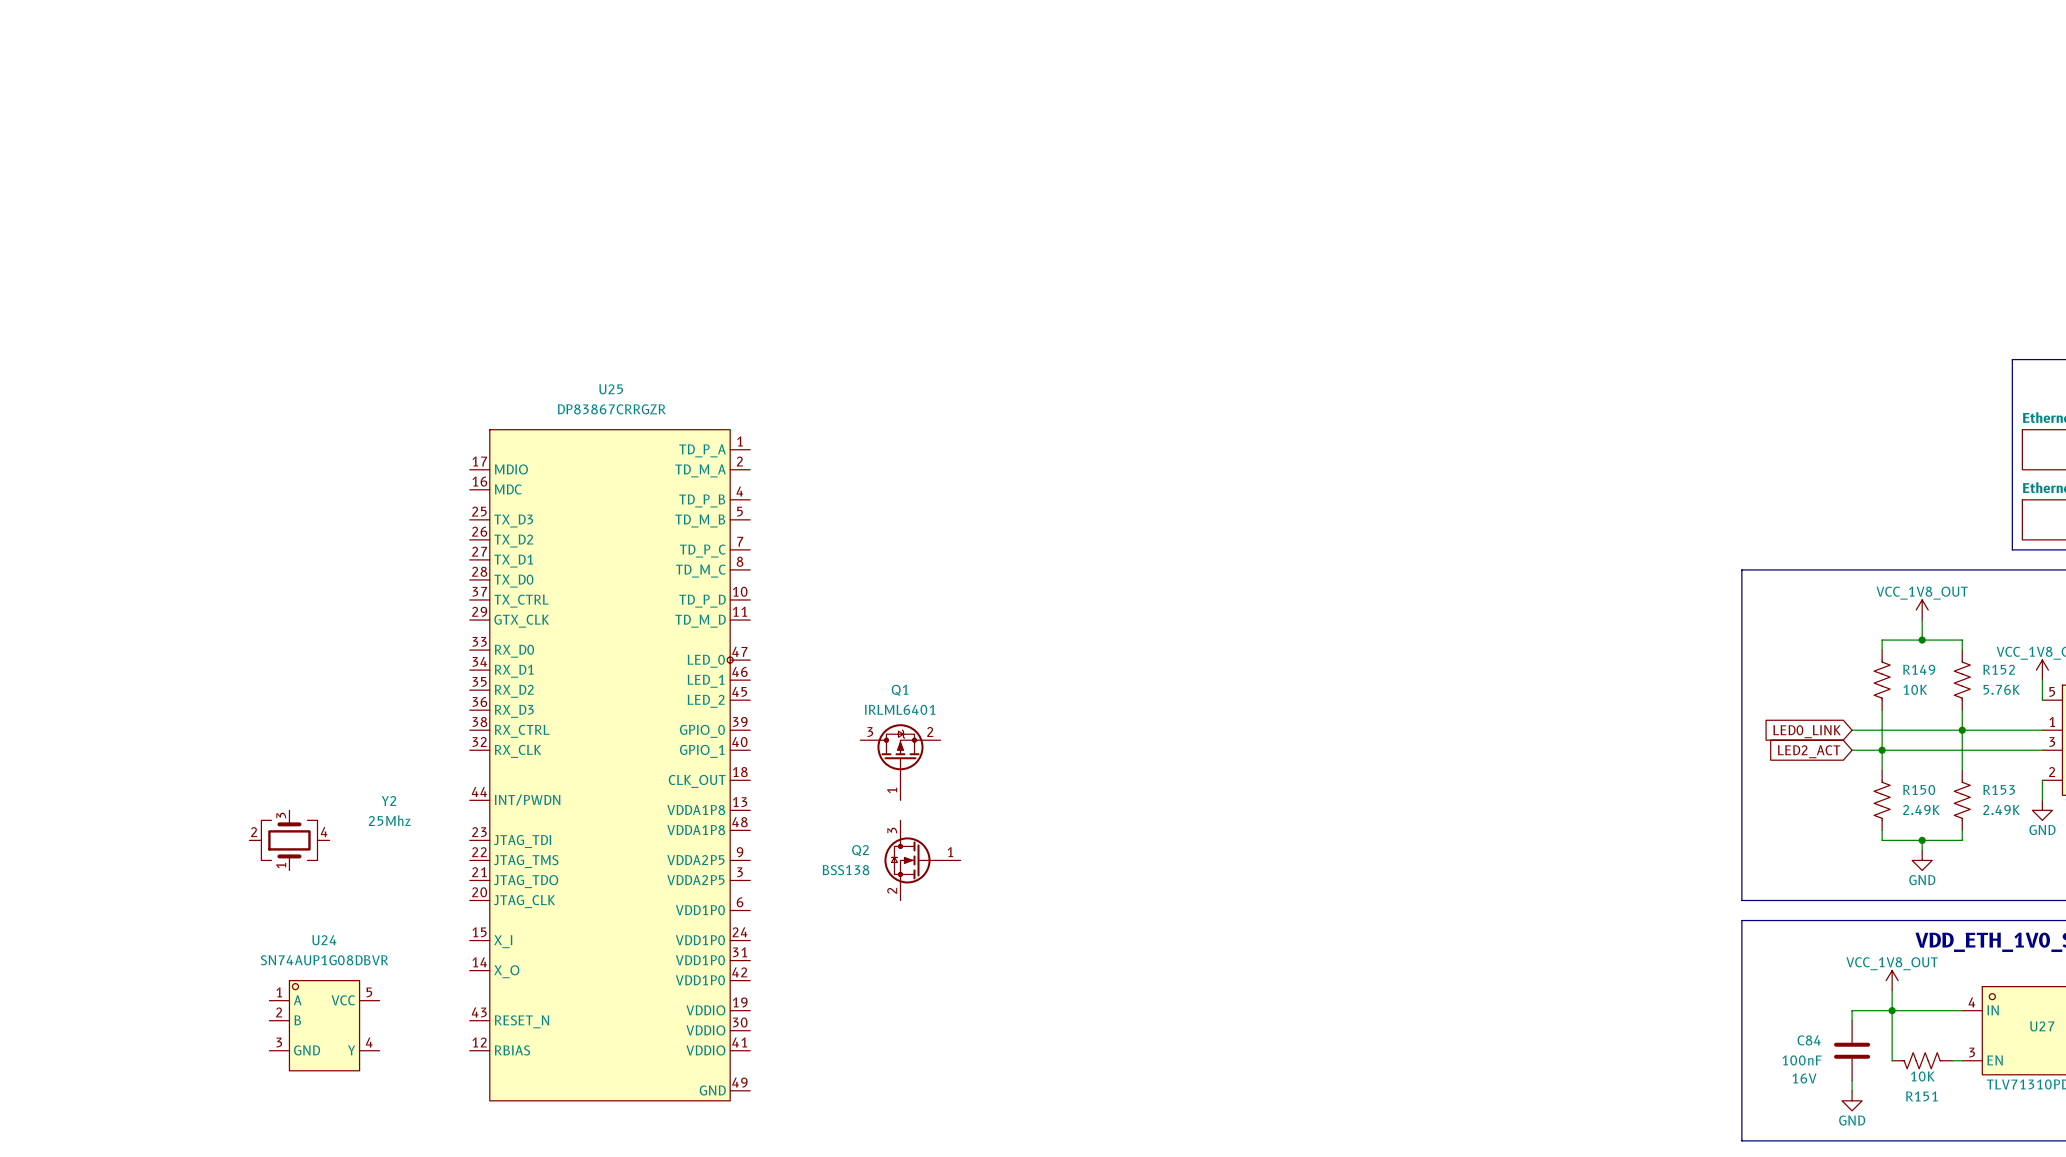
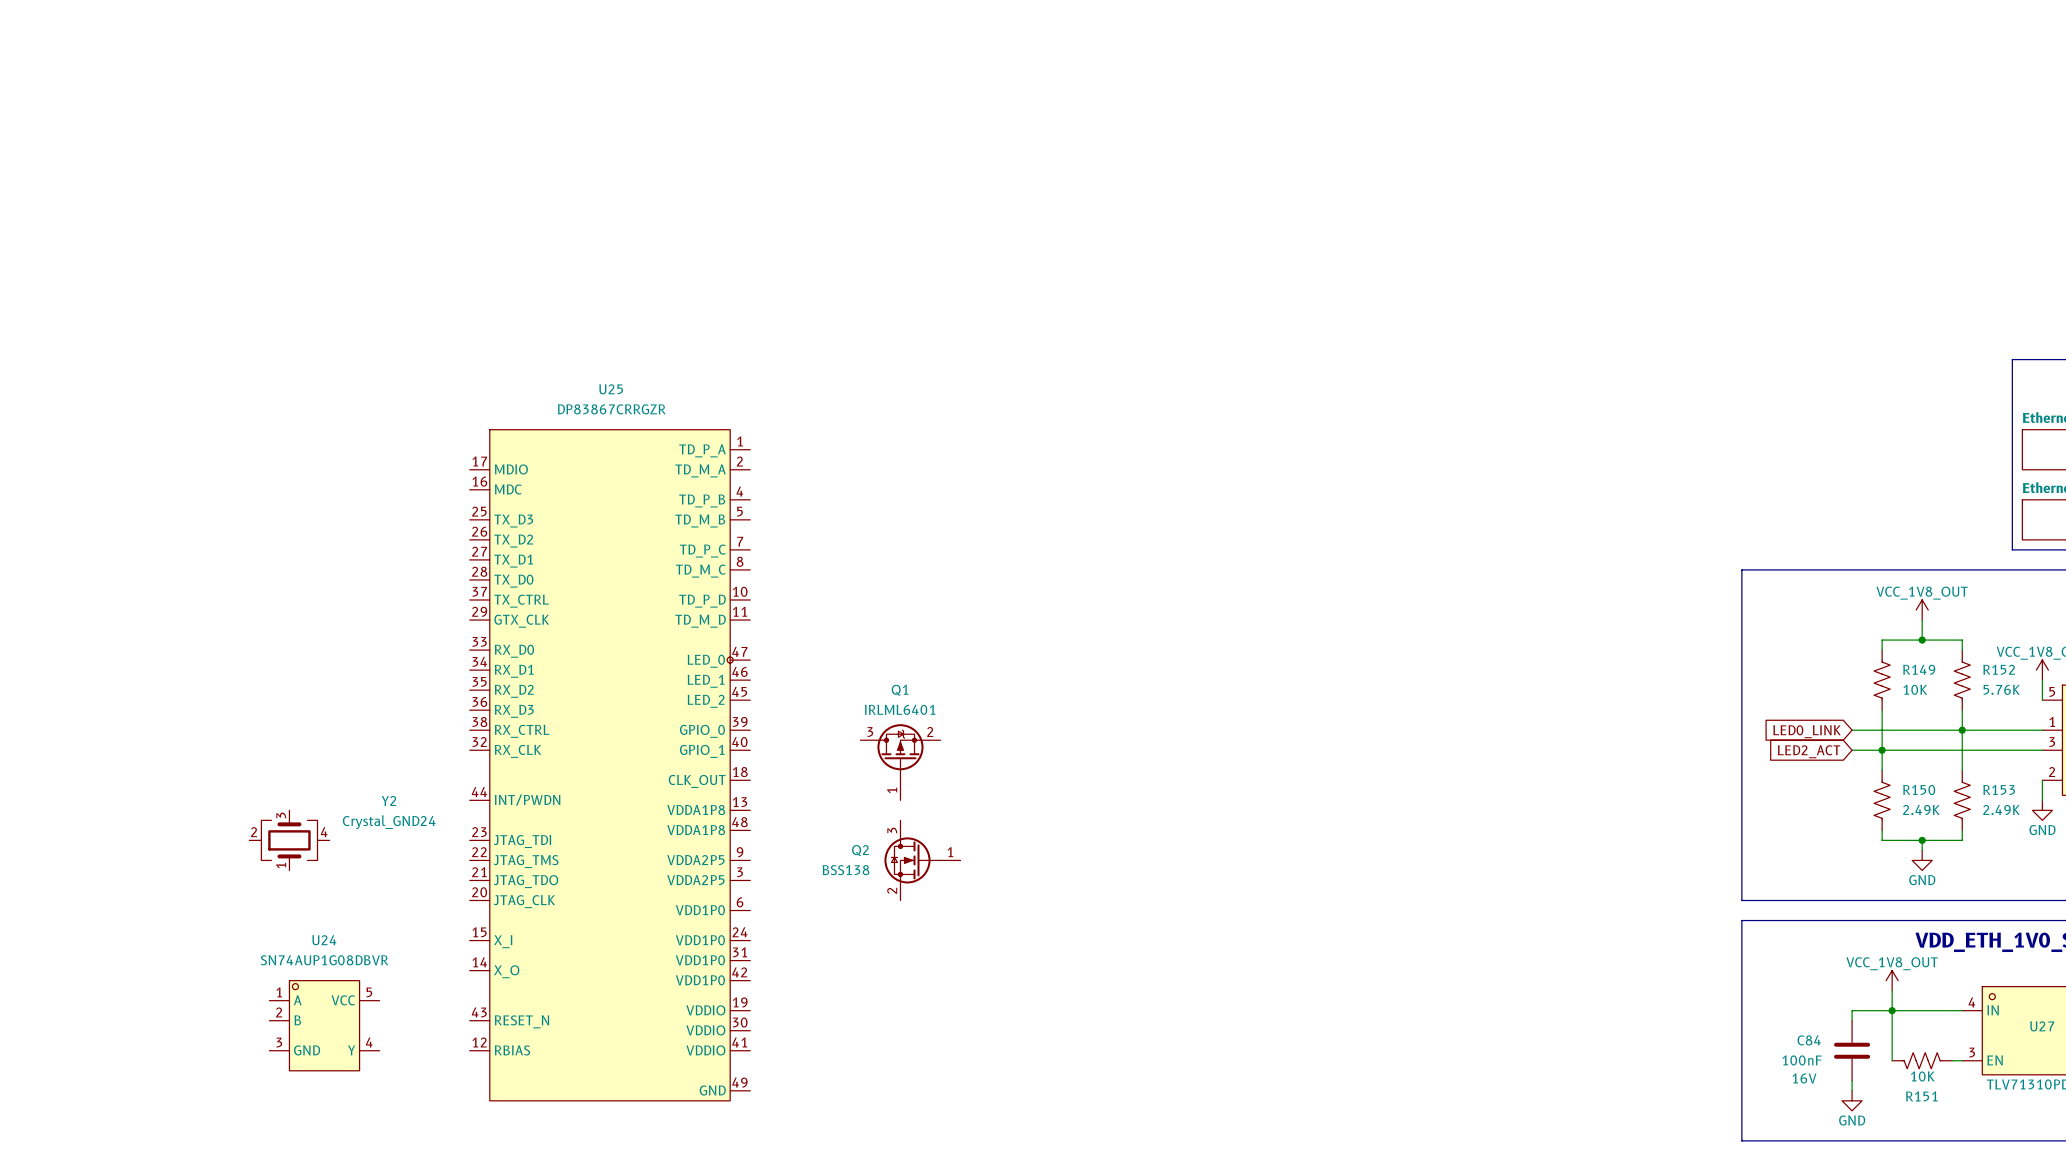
Y2 value: 25Mhz (389, 820) -> Crystal_GND24 (389, 822)

